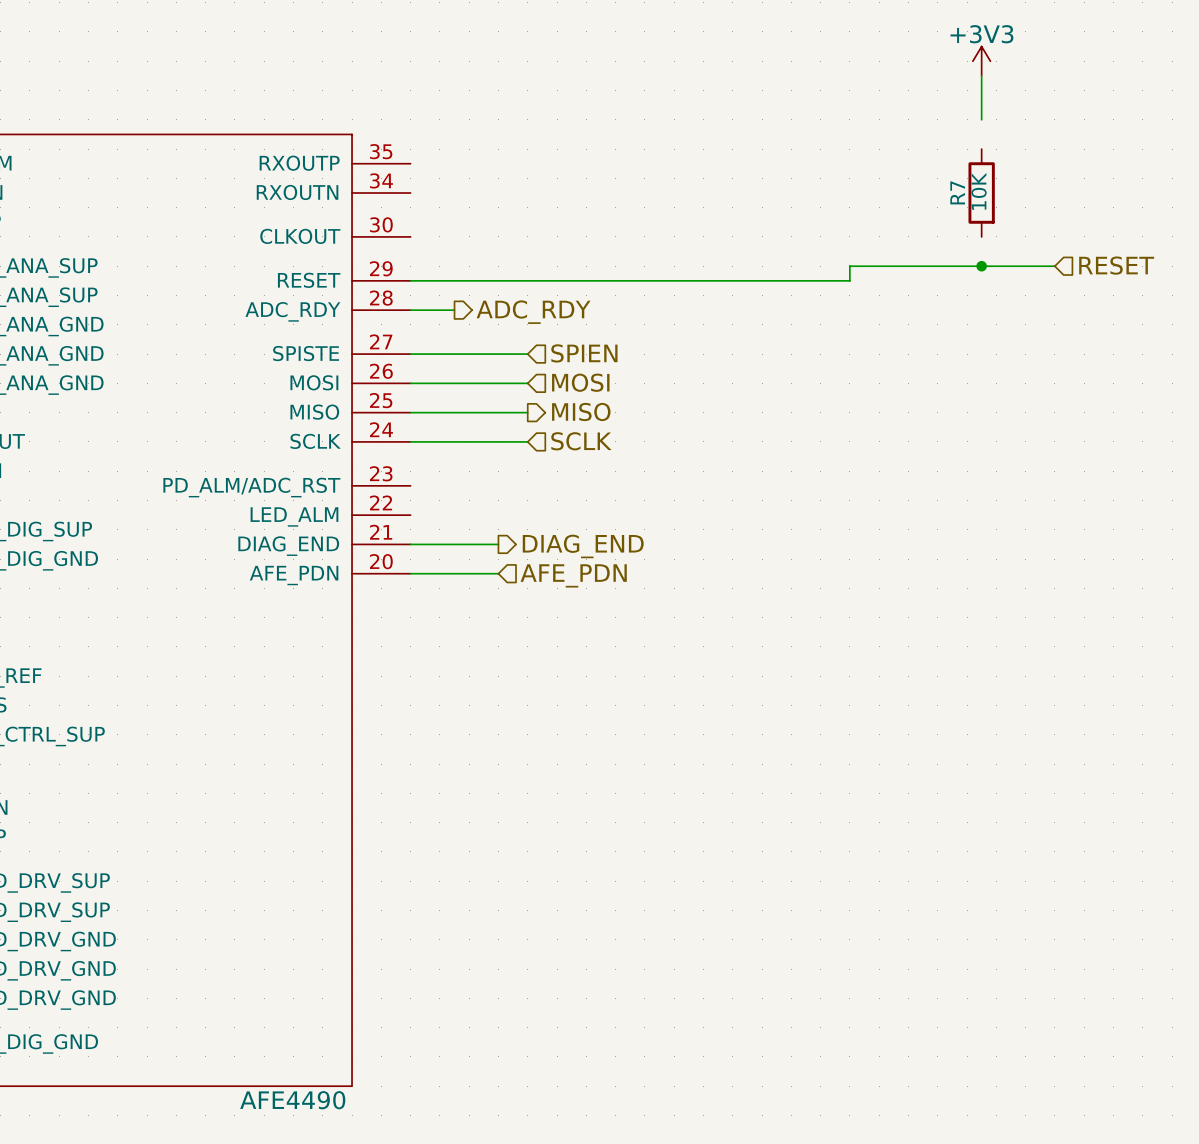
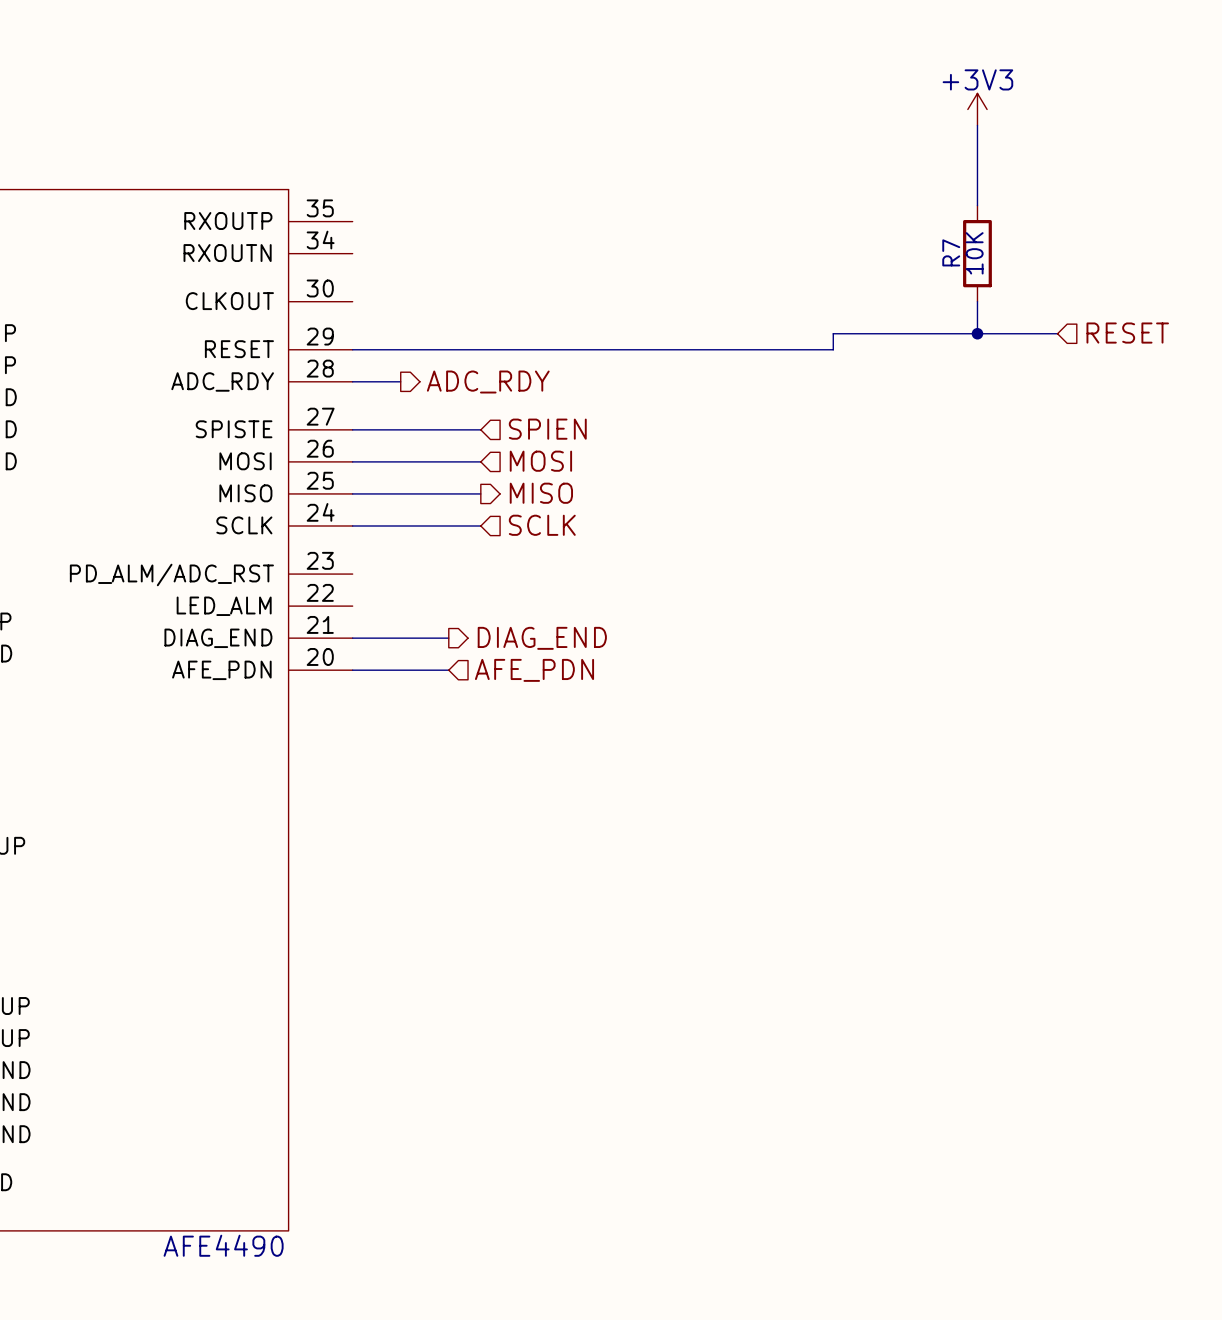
wire: none -> (977, 173) (977, 205)
wire: none -> (977, 301) (977, 333)

